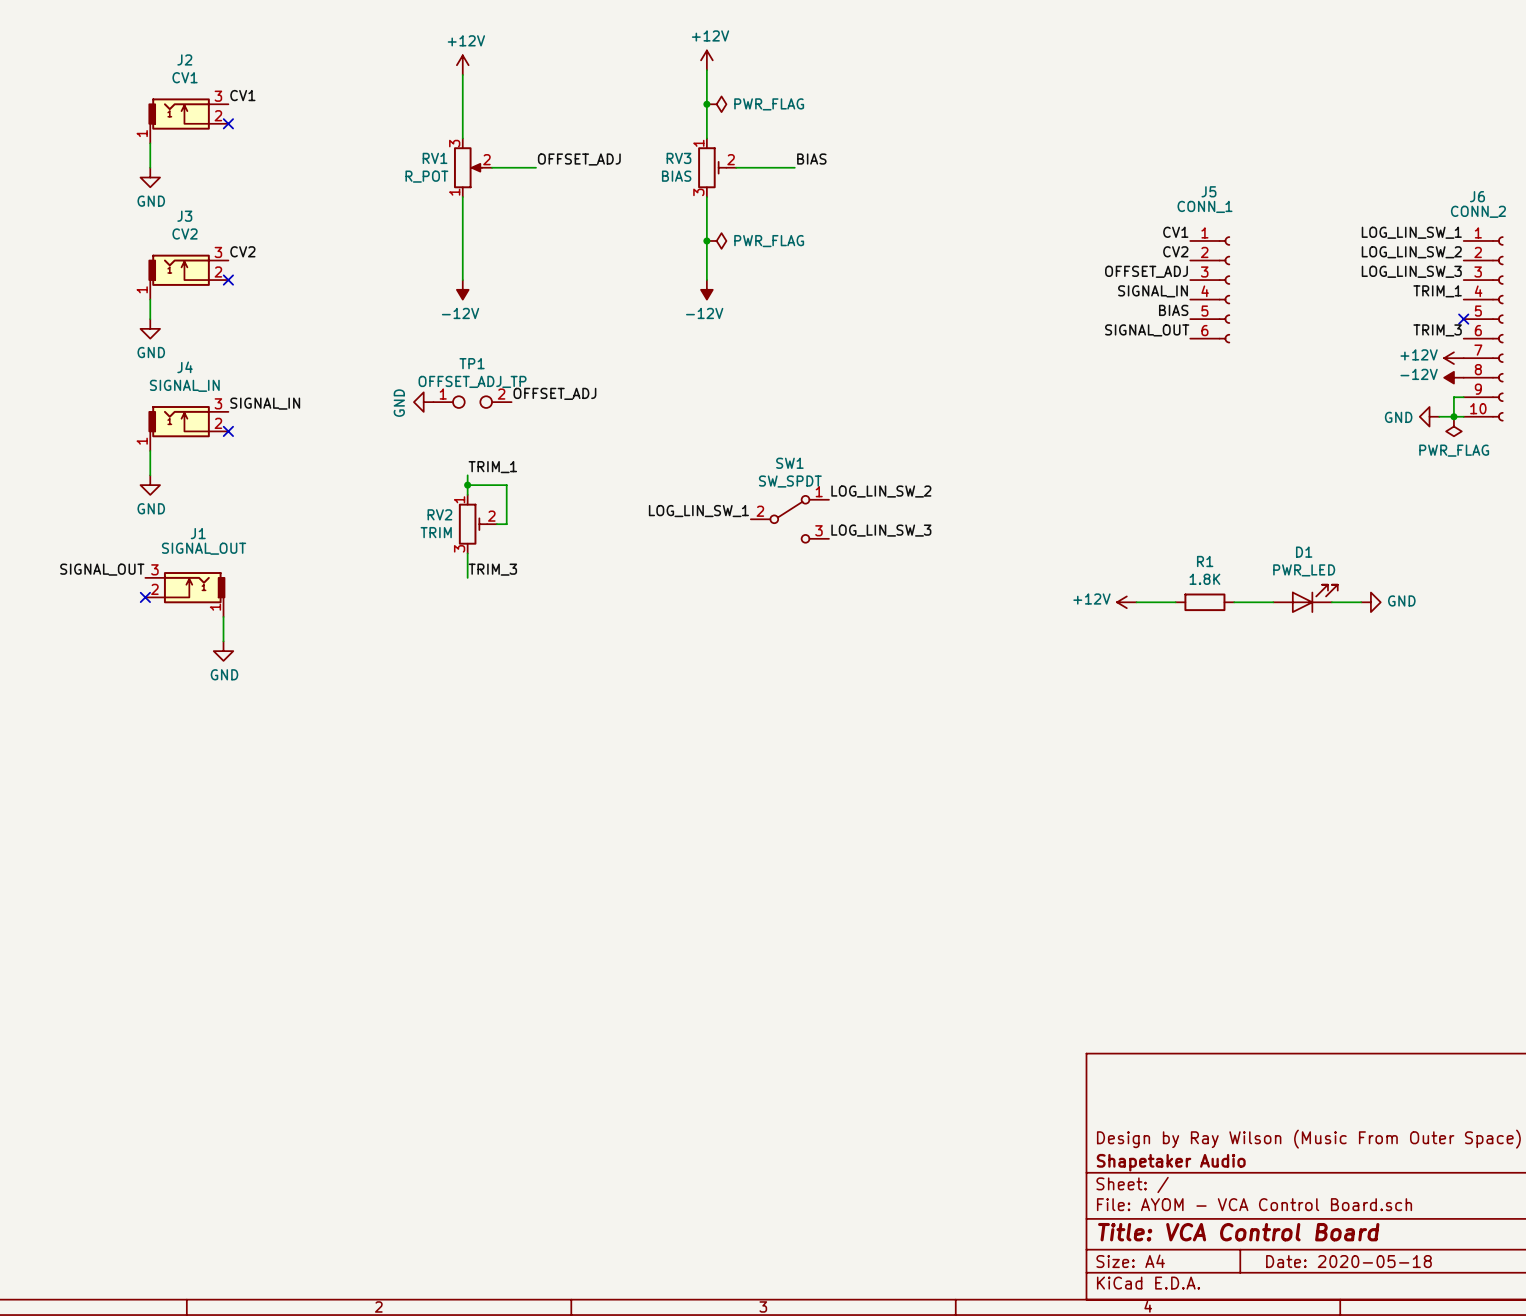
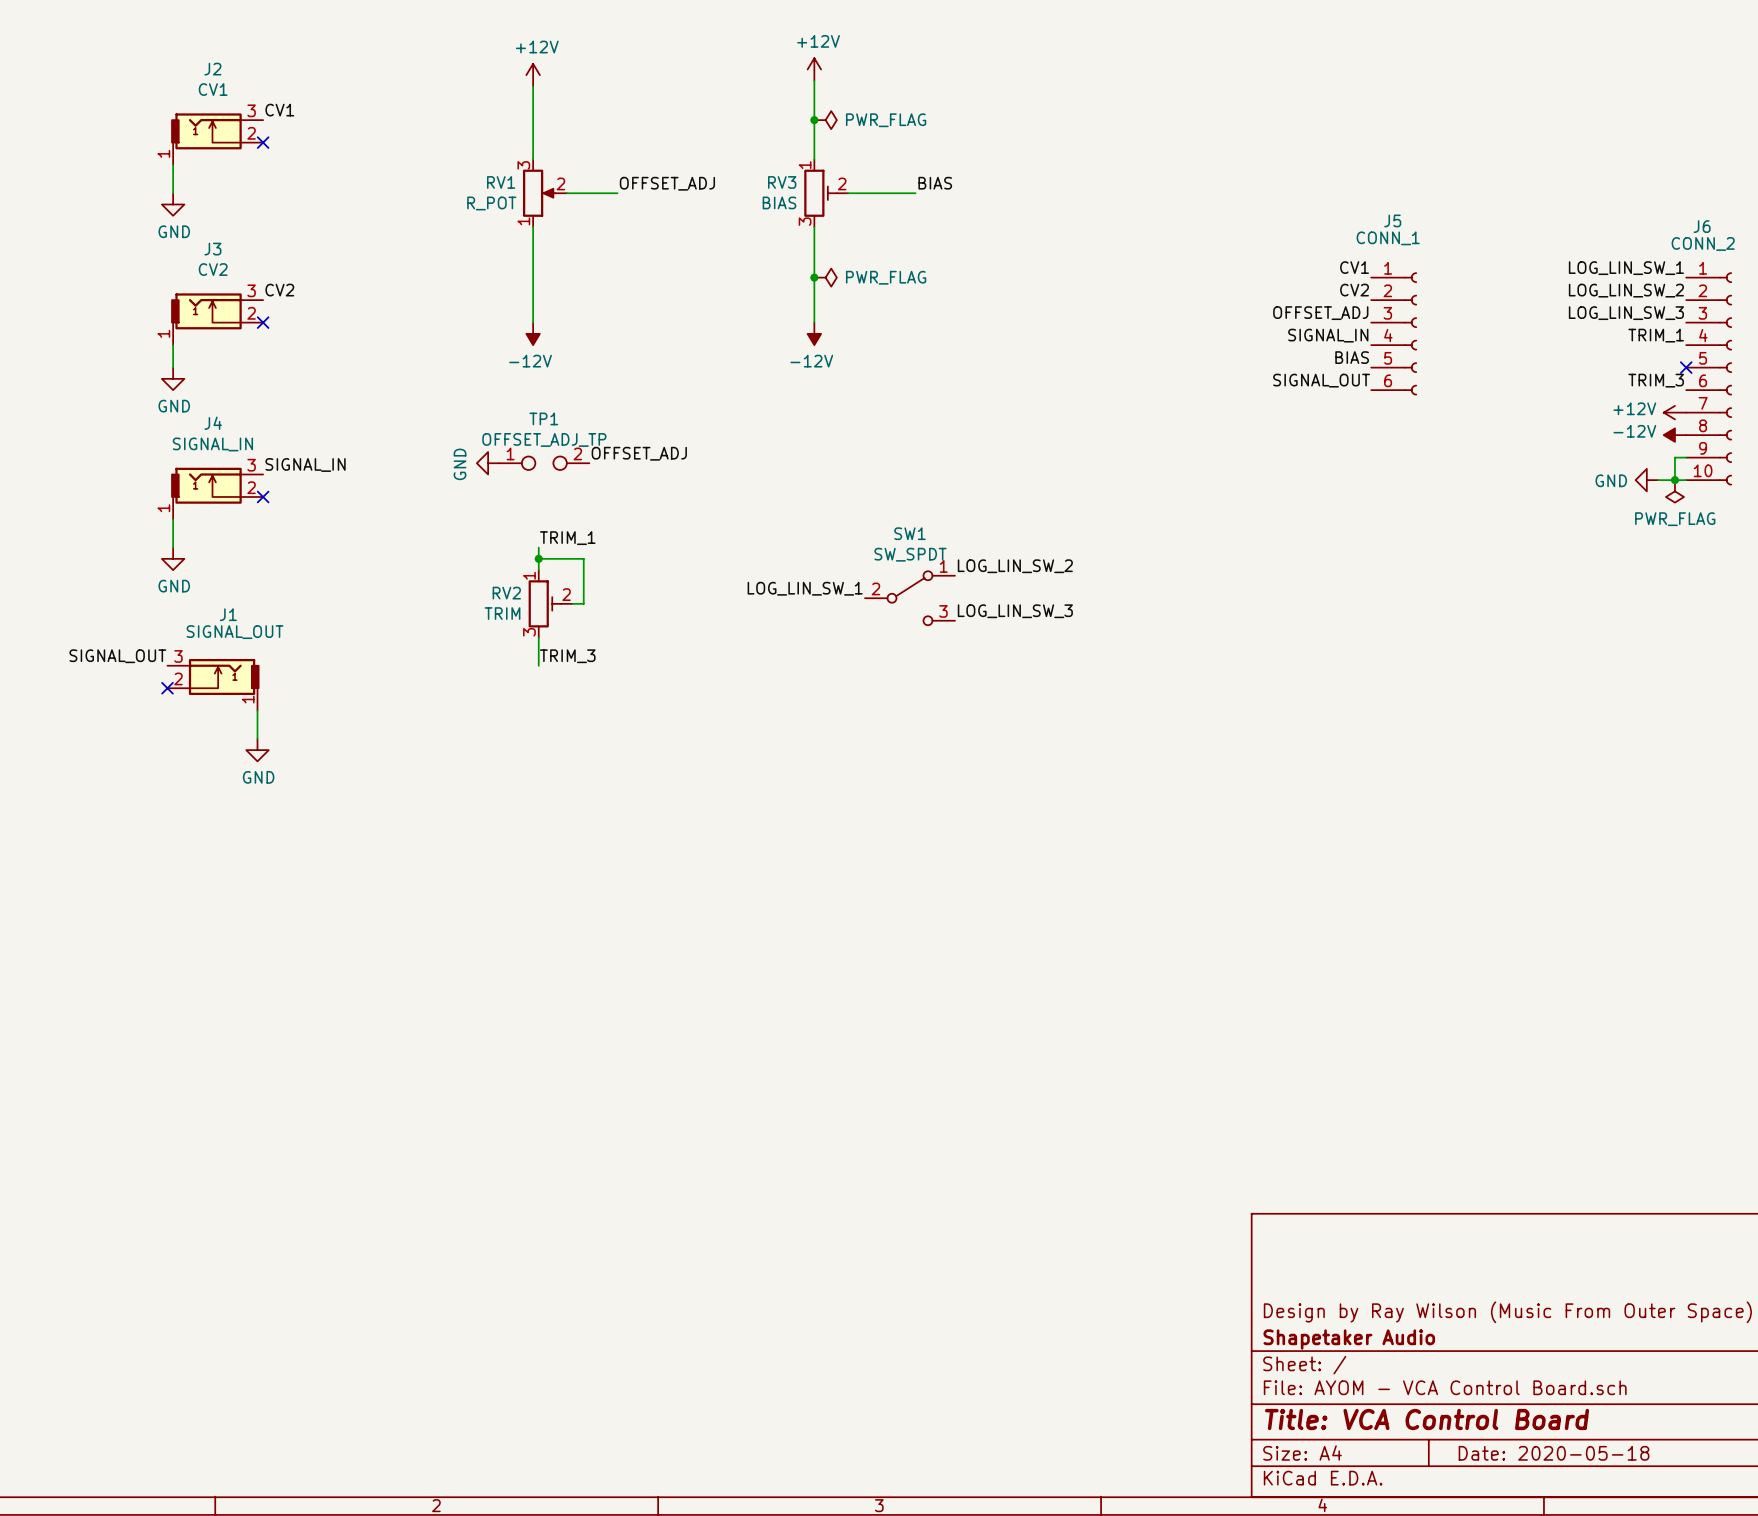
D1: PWR_LED (1305, 598) -> none
power symbol: +12V (1126, 602) -> none
wire: (1136, 602) (1175, 602) -> none
R1: 1.8K (1204, 602) -> none
wire: (1234, 602) (1273, 602) -> none
wire: (1331, 602) (1361, 602) -> none
power symbol: GND (1370, 602) -> none

